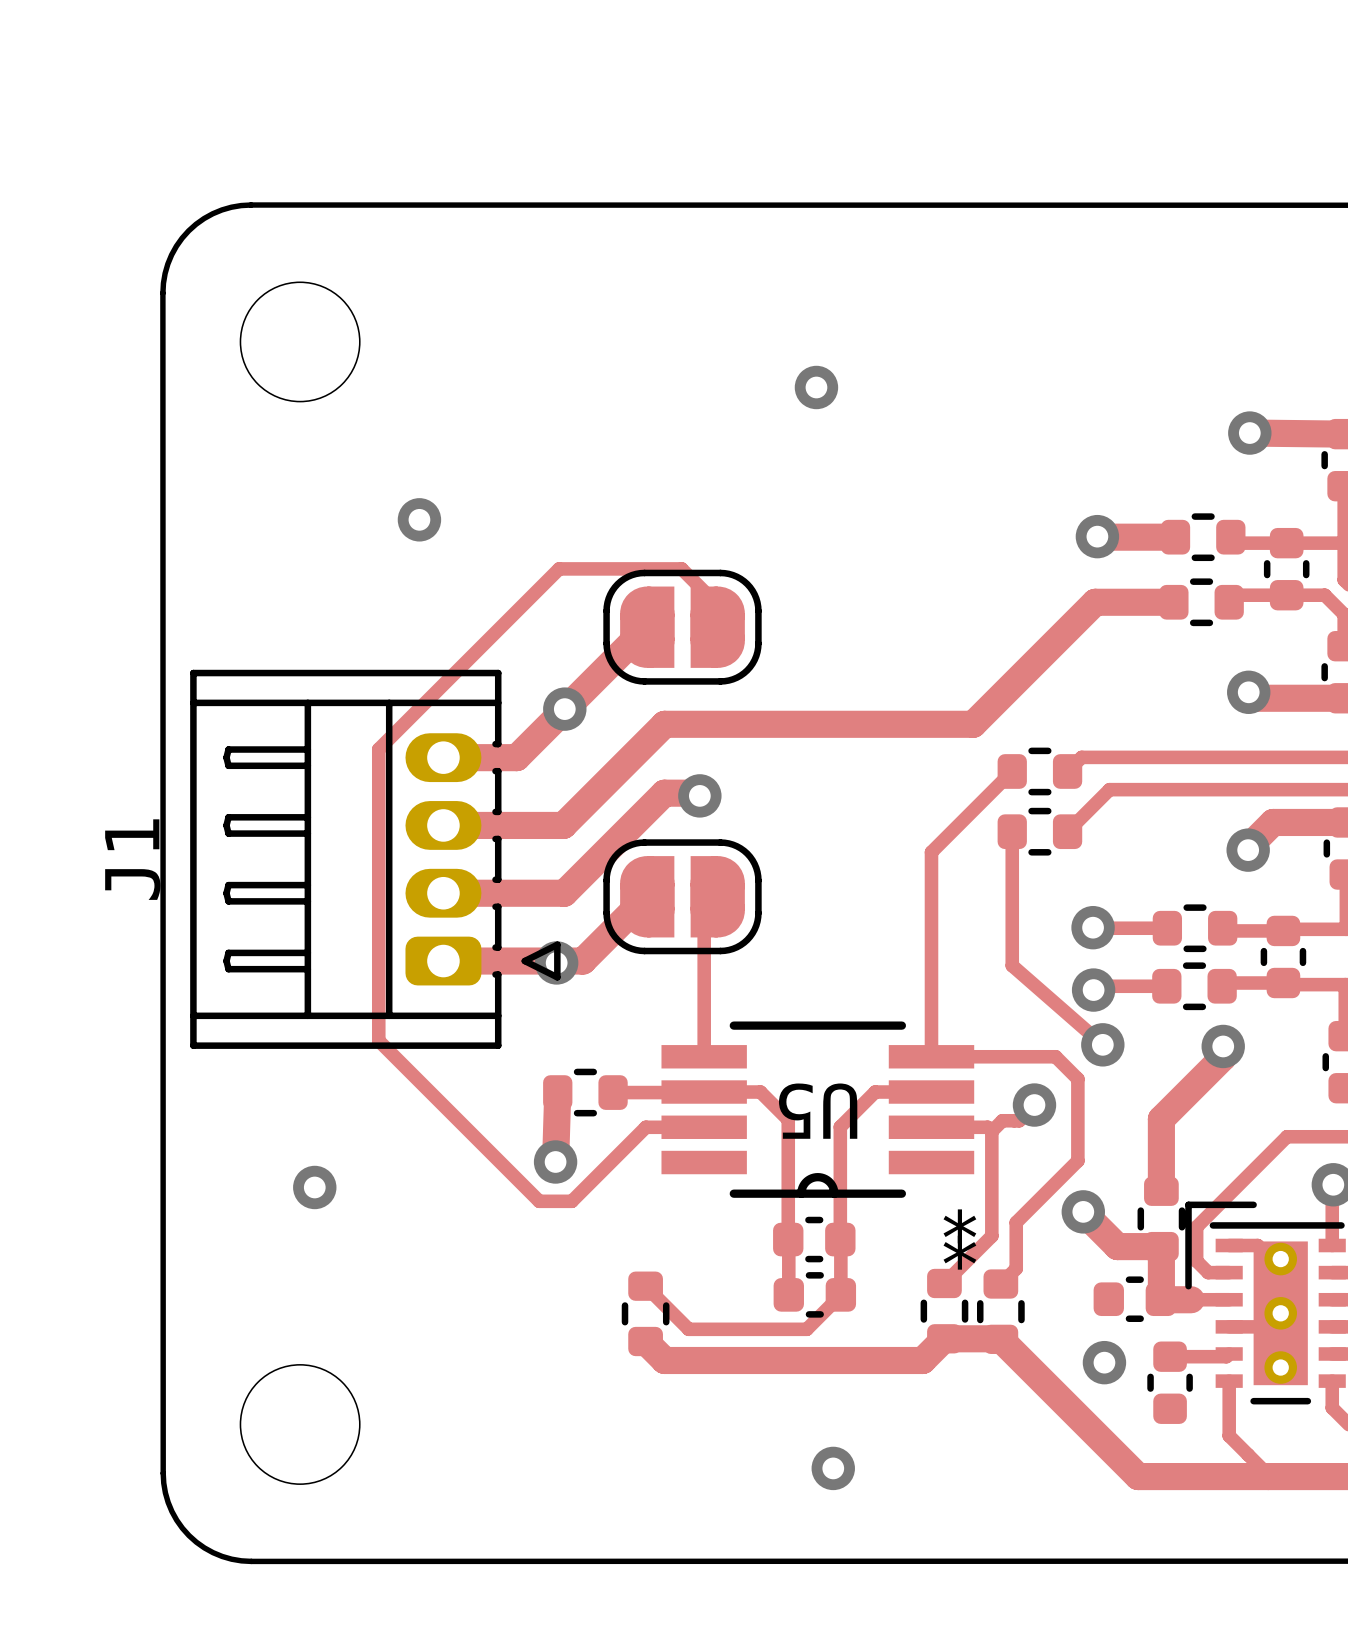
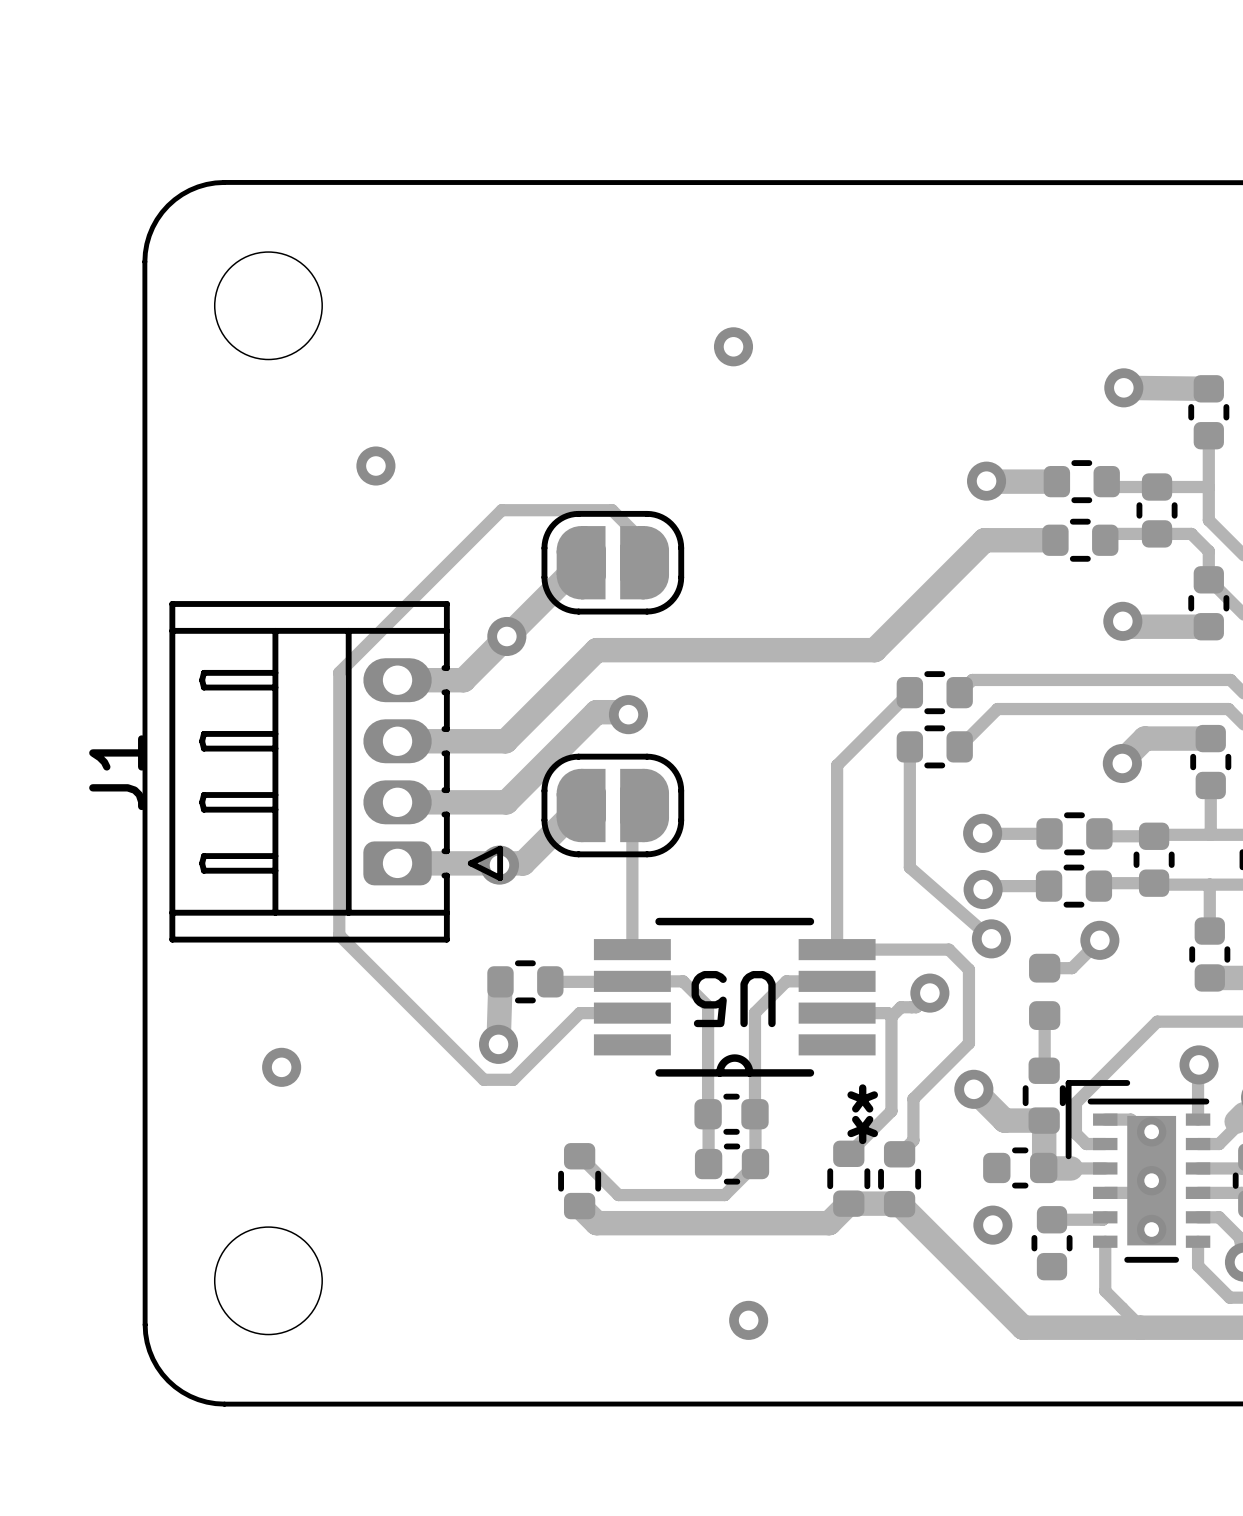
track: (1223, 1046) (1223, 1057) (1161, 1119) (1161, 1191) -> (1044, 1015) (1044, 1070)
track: none -> (1099, 940) (1072, 968) (1044, 968)
part: none -> (1044, 991)

